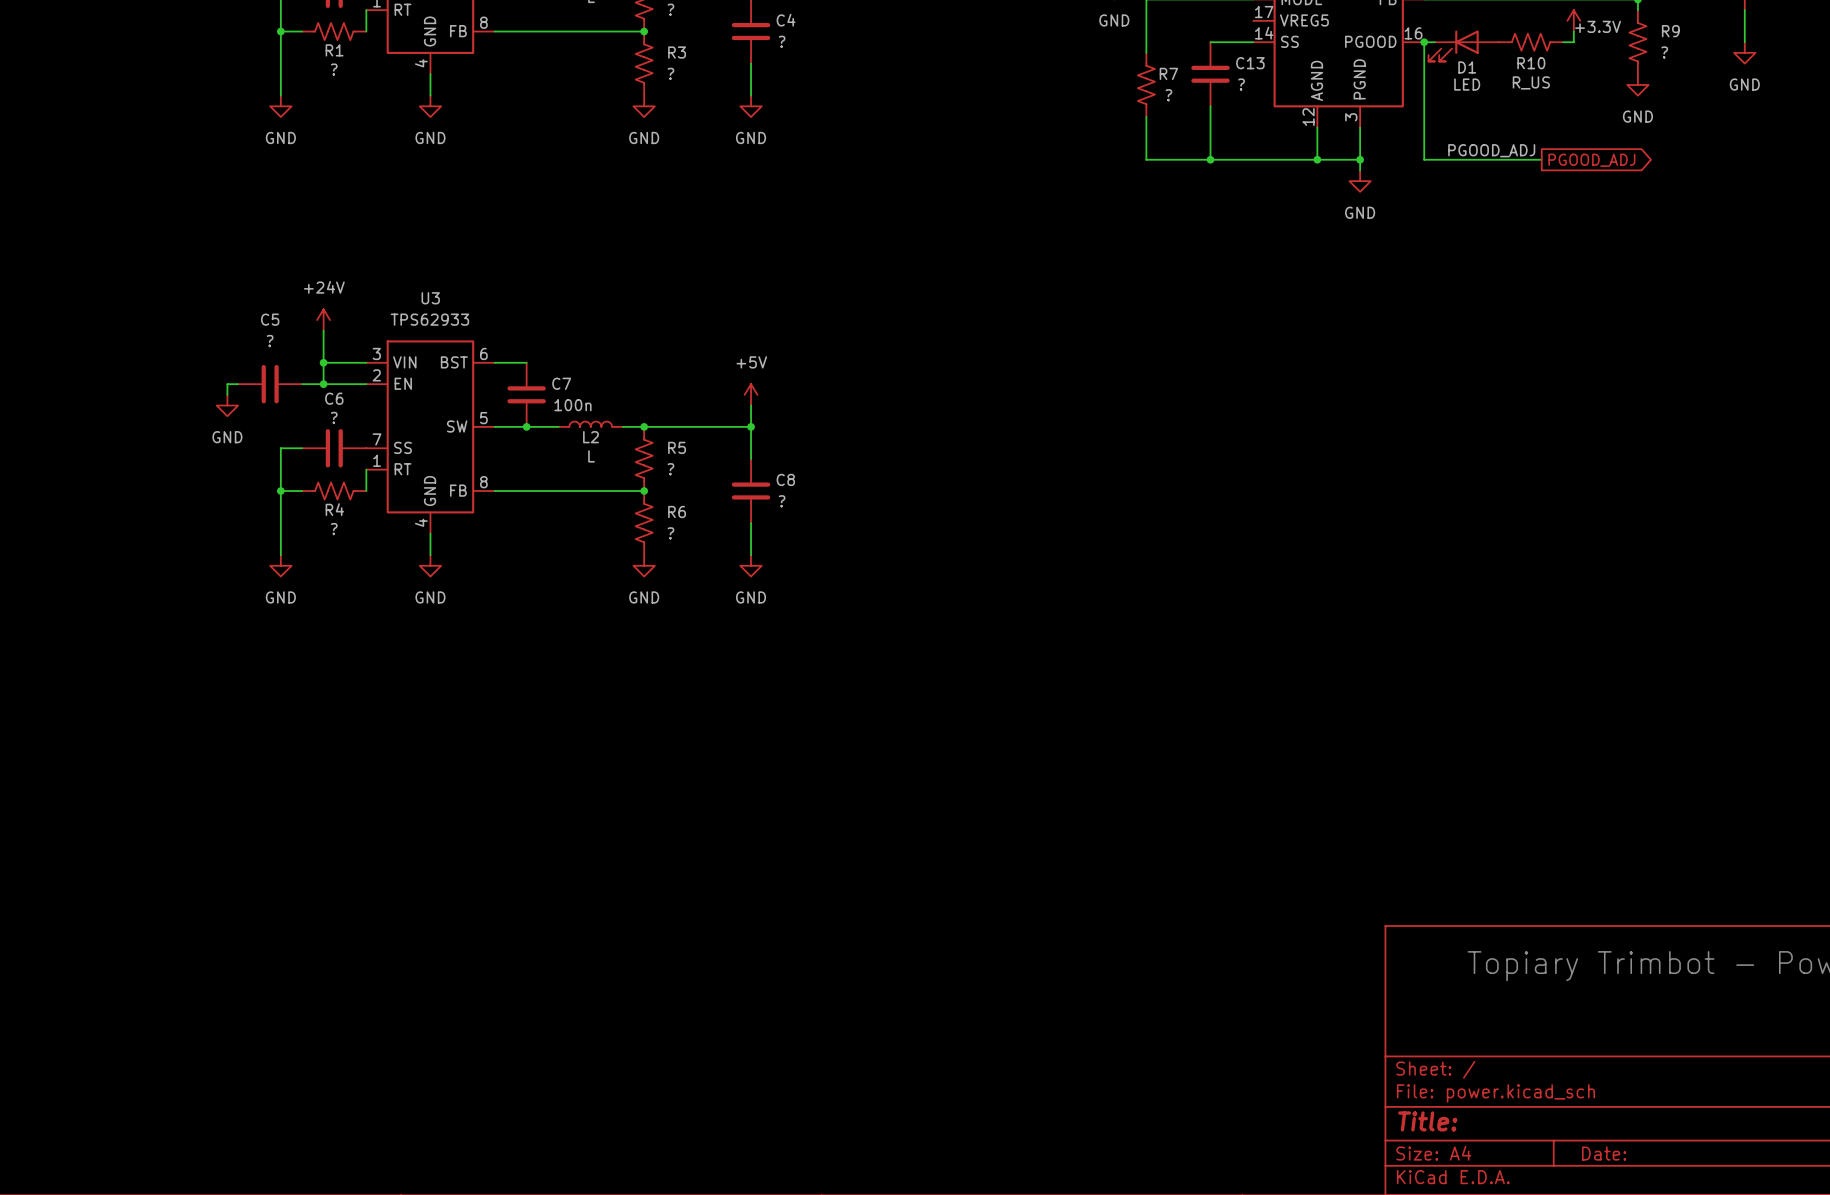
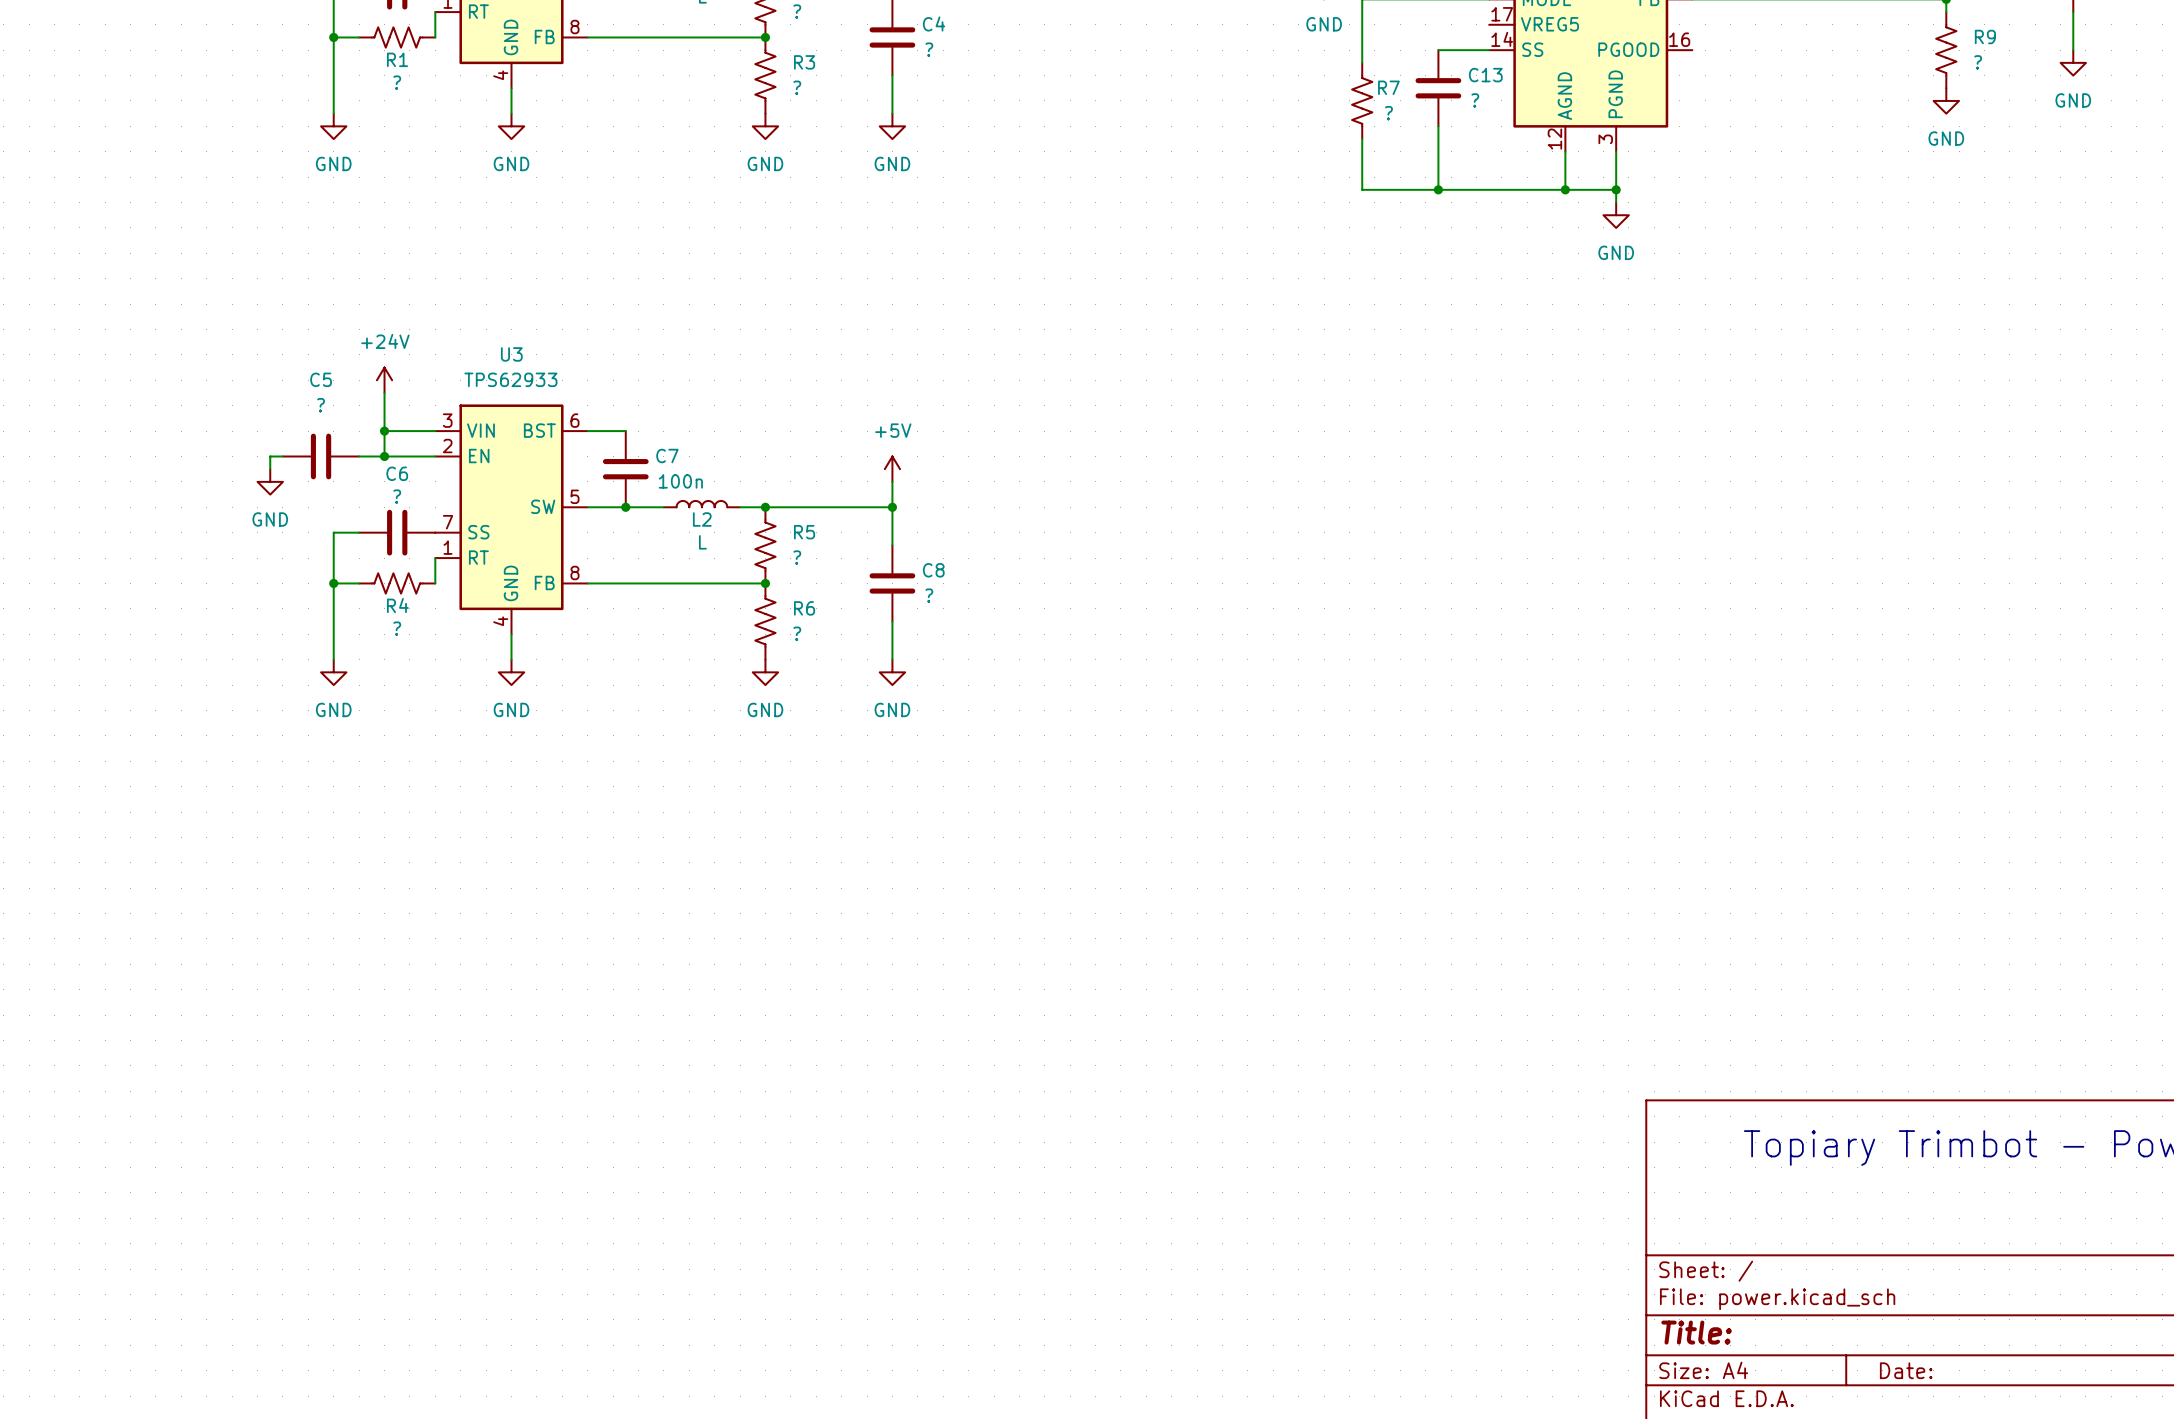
power symbol: +3.3V (1573, 20) -> none
wire: (1573, 31) (1573, 42) (1563, 42) -> none
junction: (1424, 42) -> none
wire: (1434, 42) (1424, 42) (1424, 159) (1541, 159) -> none
R10: R_US (1531, 42) -> none
D1: LED (1463, 45) -> none
label: PGOOD_ADJ (1491, 150) -> none
global label: PGOOD_ADJ (1591, 160) -> none

